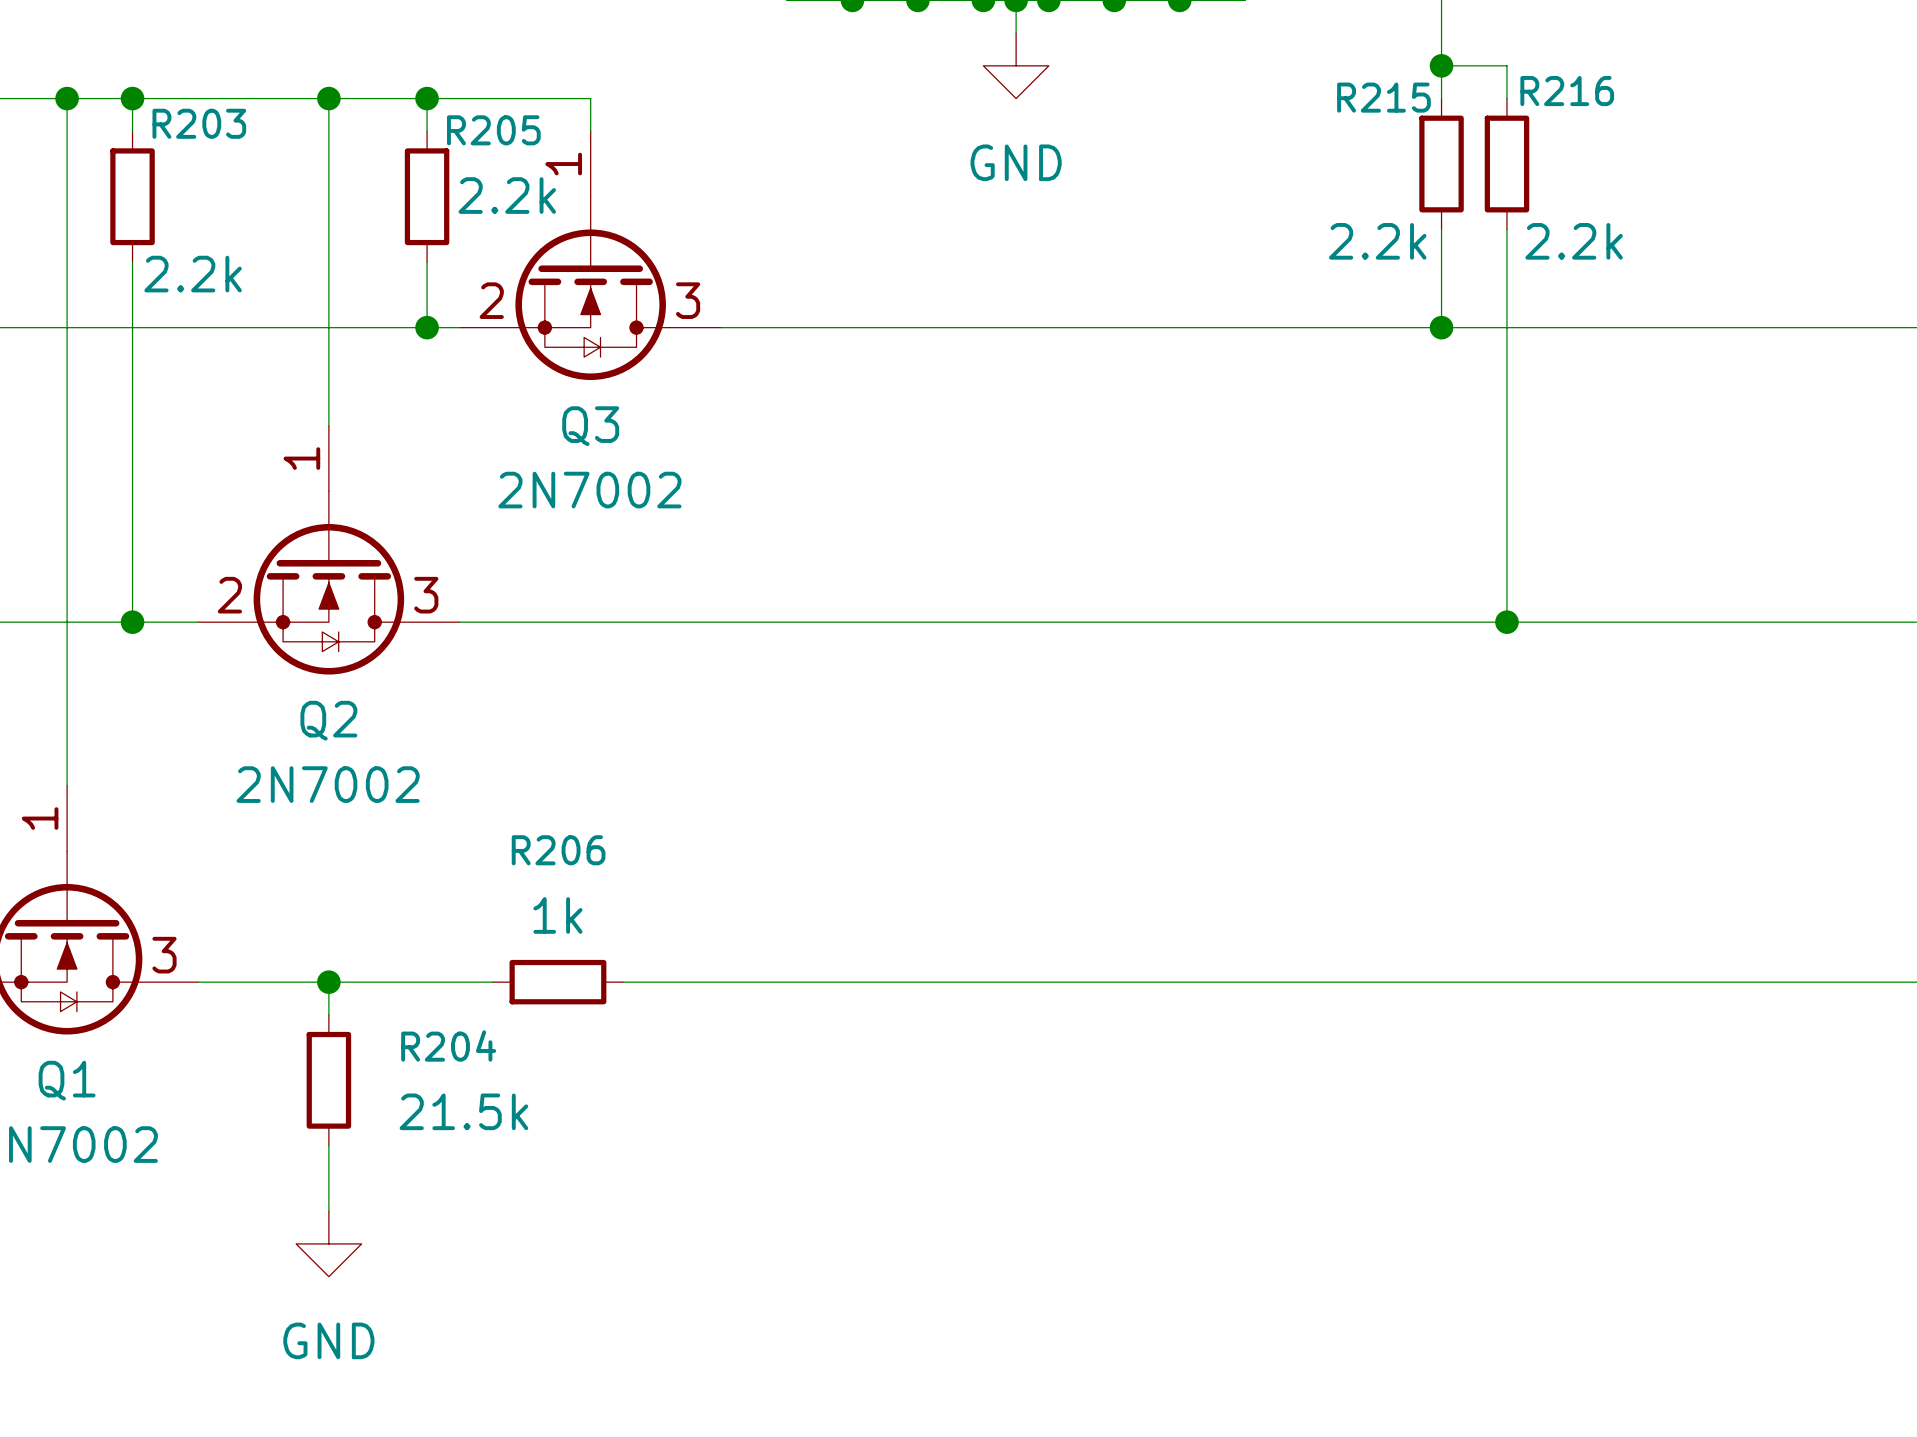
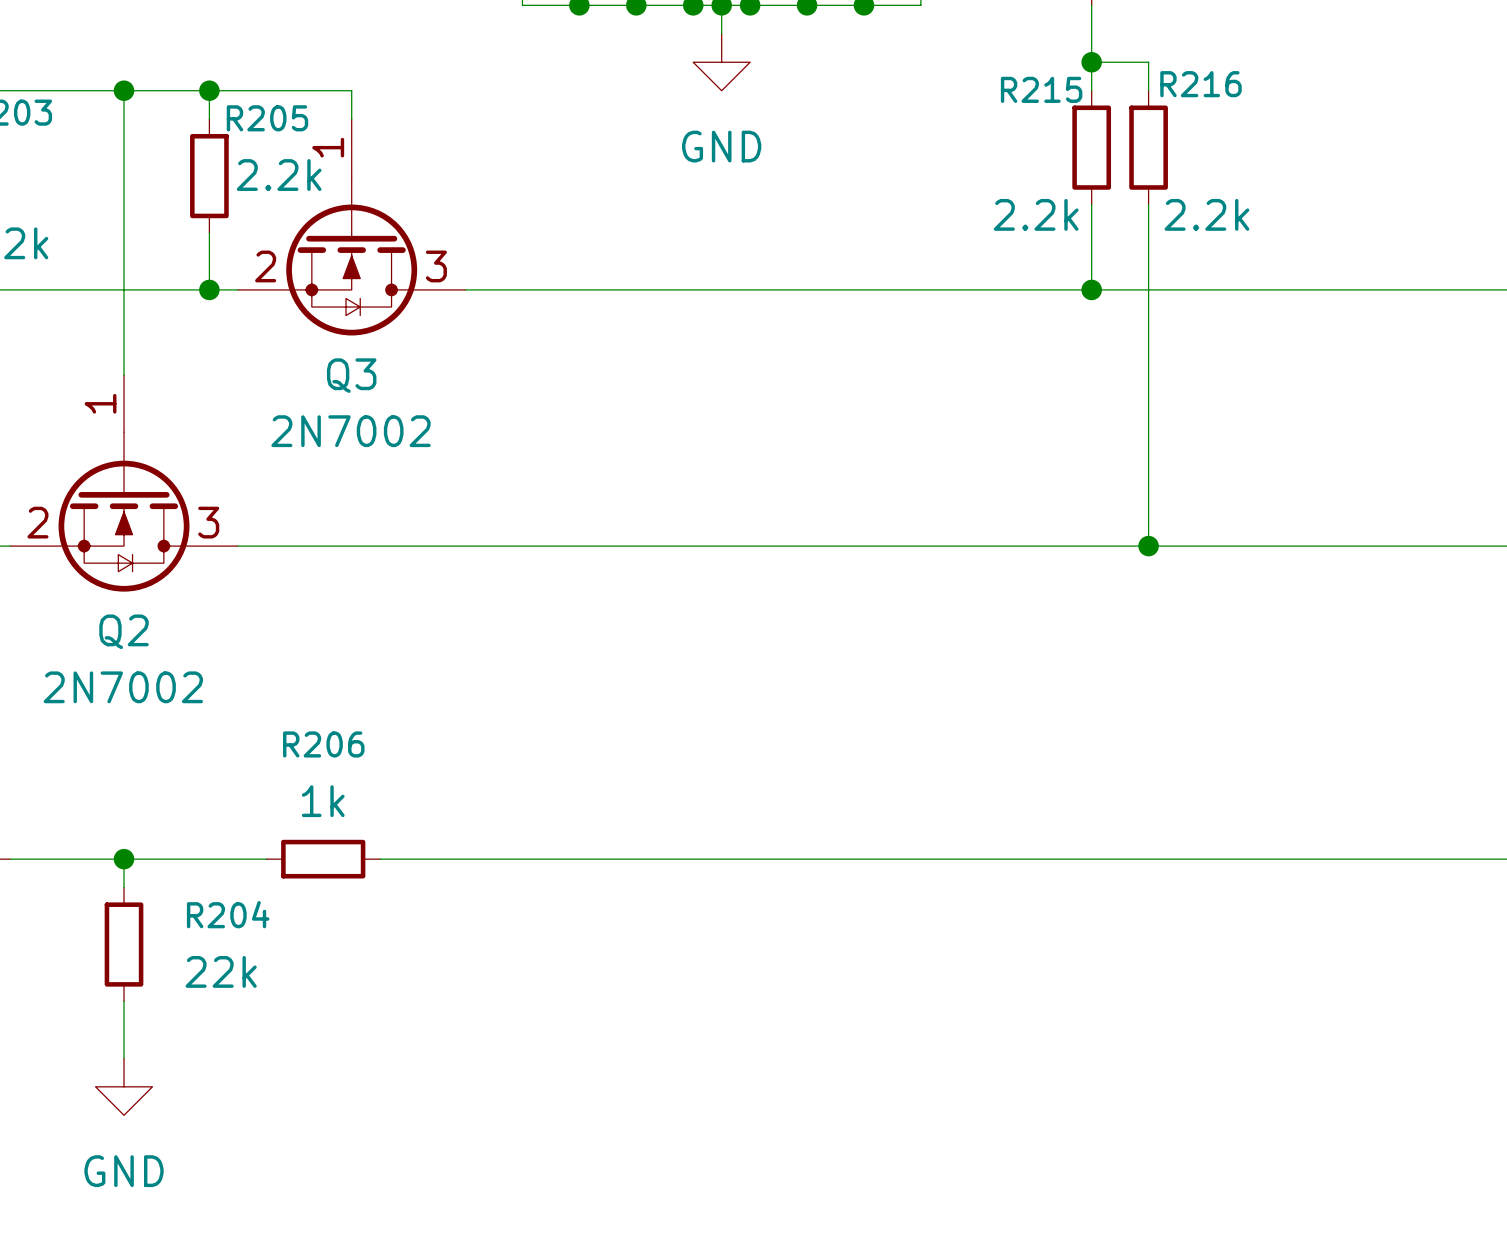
R204 value: 21.5k (463, 1111) -> 22k (221, 971)

